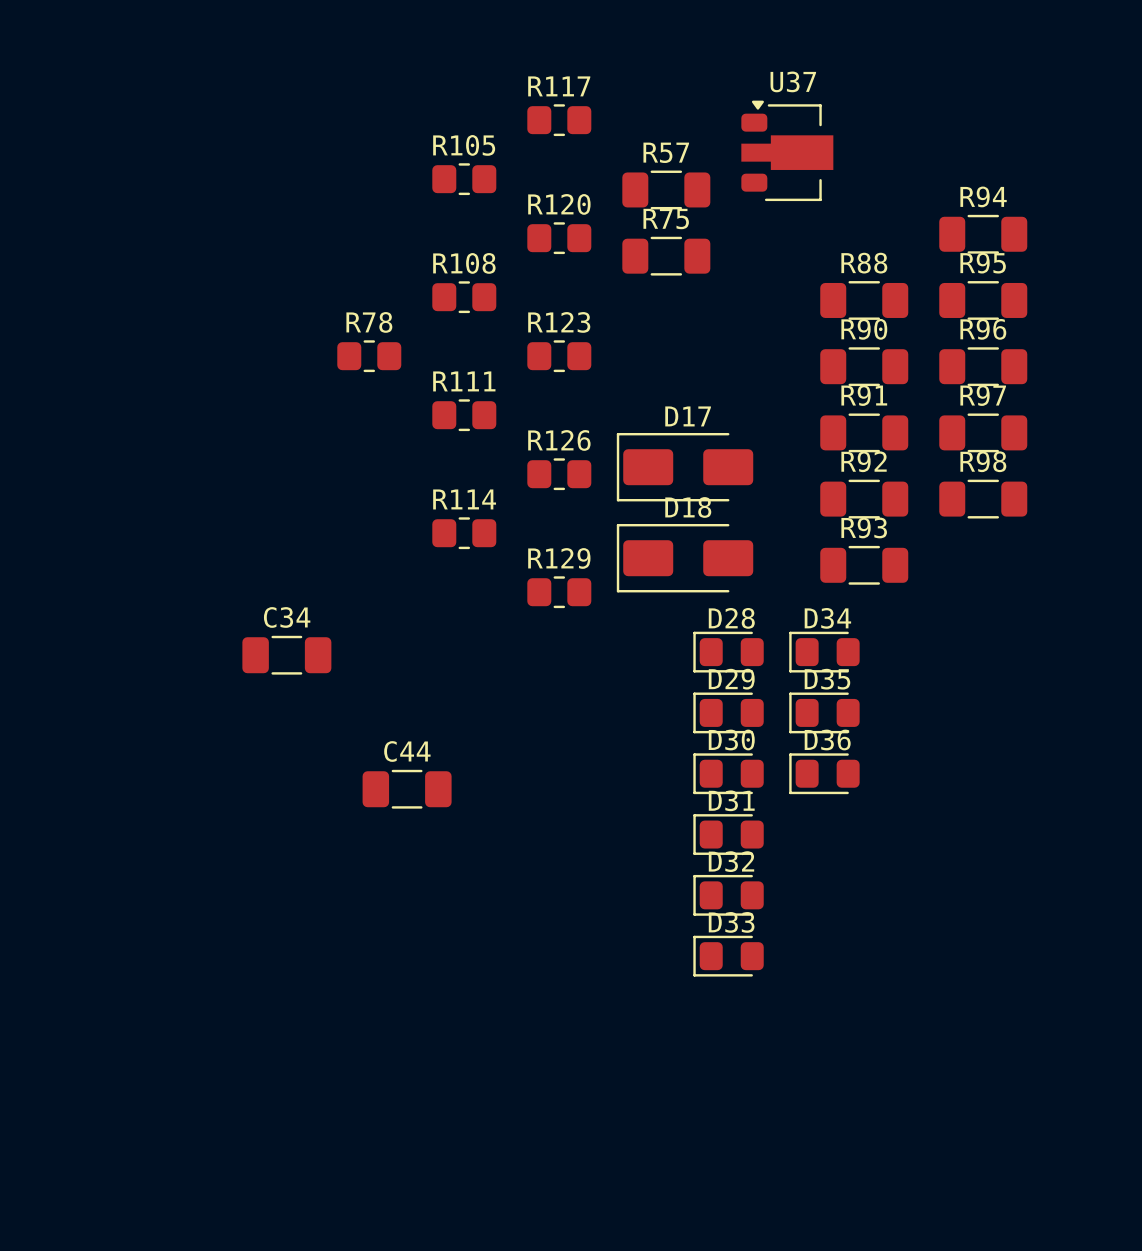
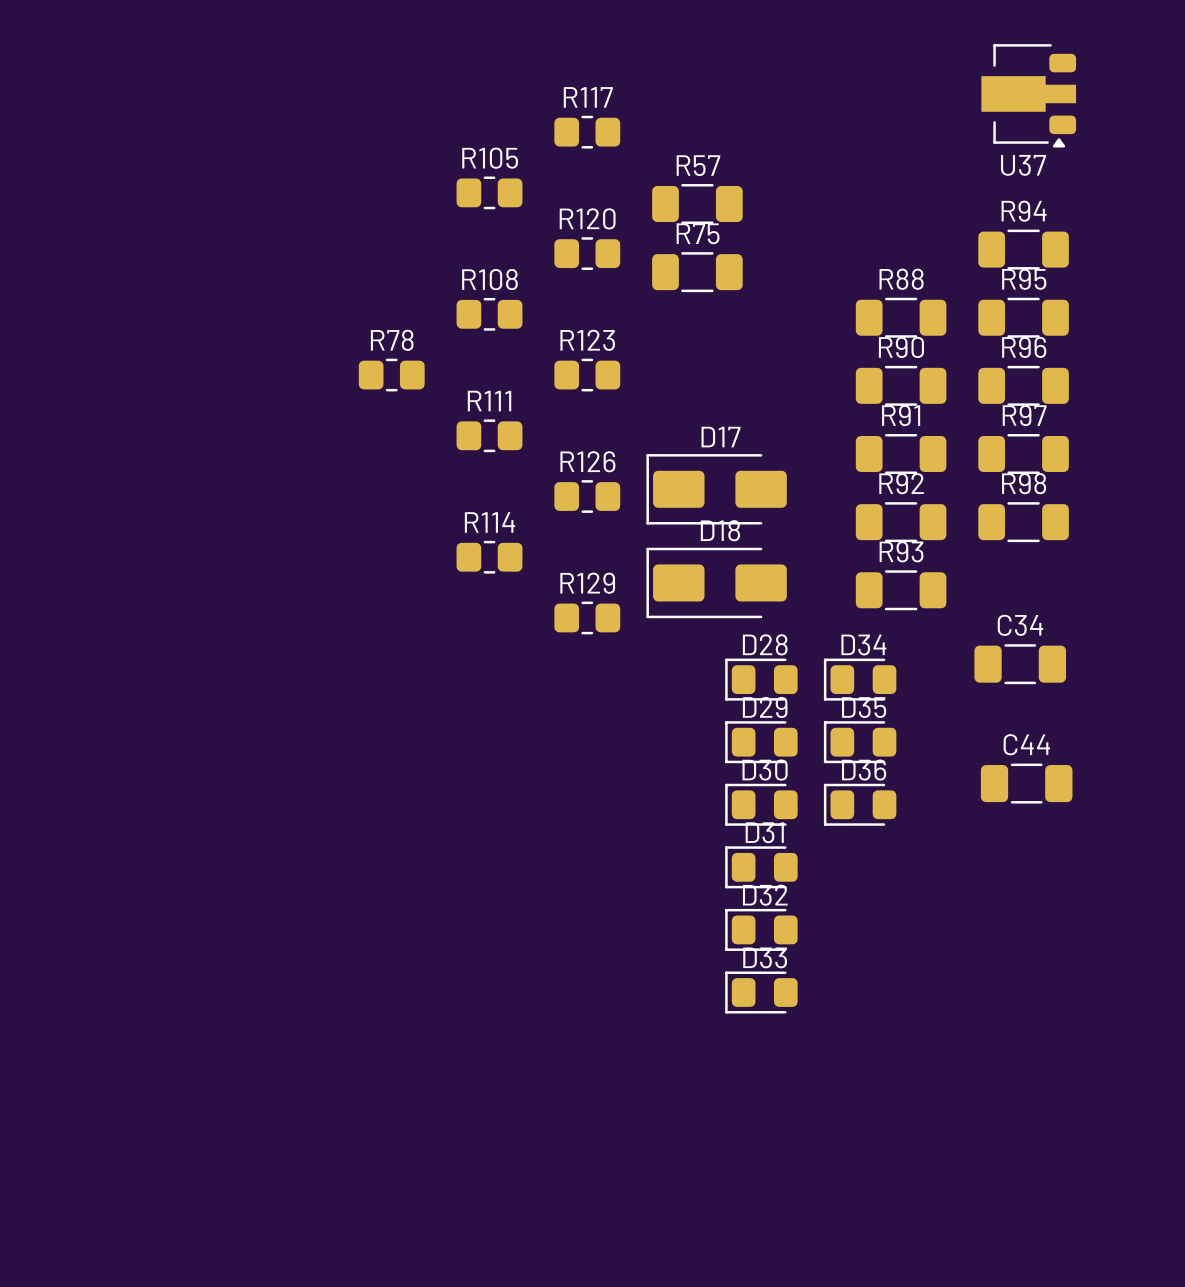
U37 rotation: 0° (787, 150) -> 180° (1028, 95)
U37 position: (787, 150) -> (1028, 95)
C34 position: (286, 655) -> (1020, 664)
C44 position: (407, 789) -> (1026, 783)

